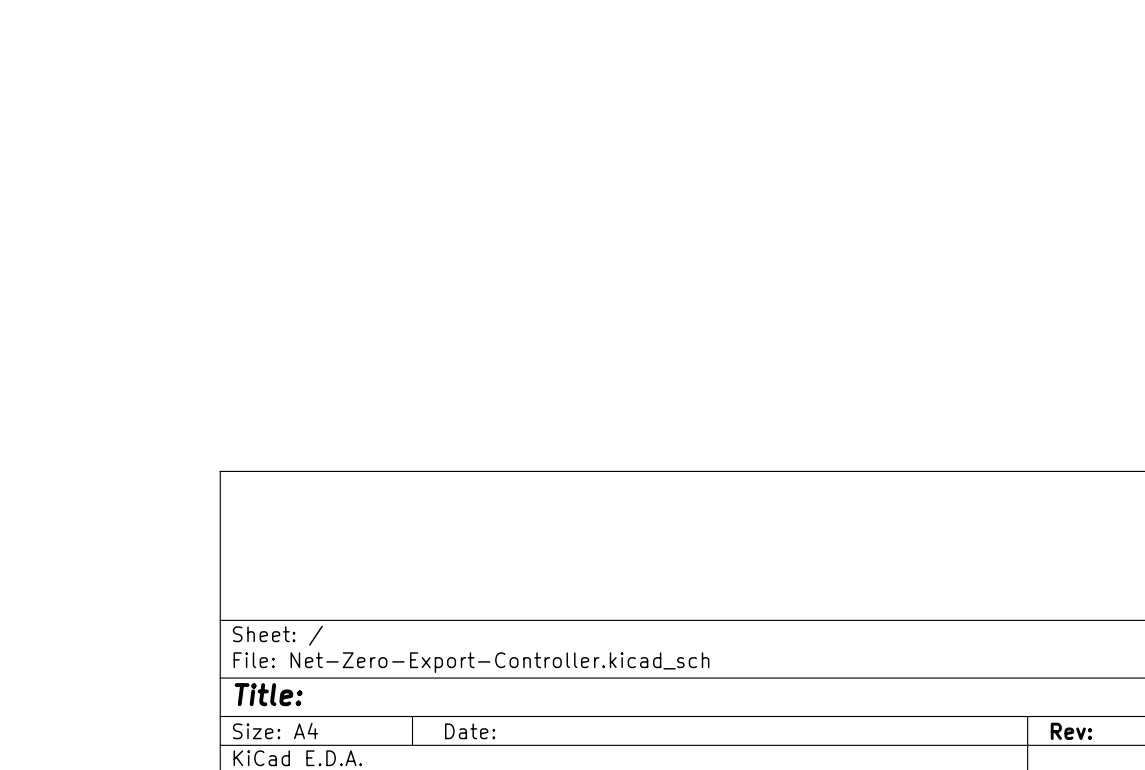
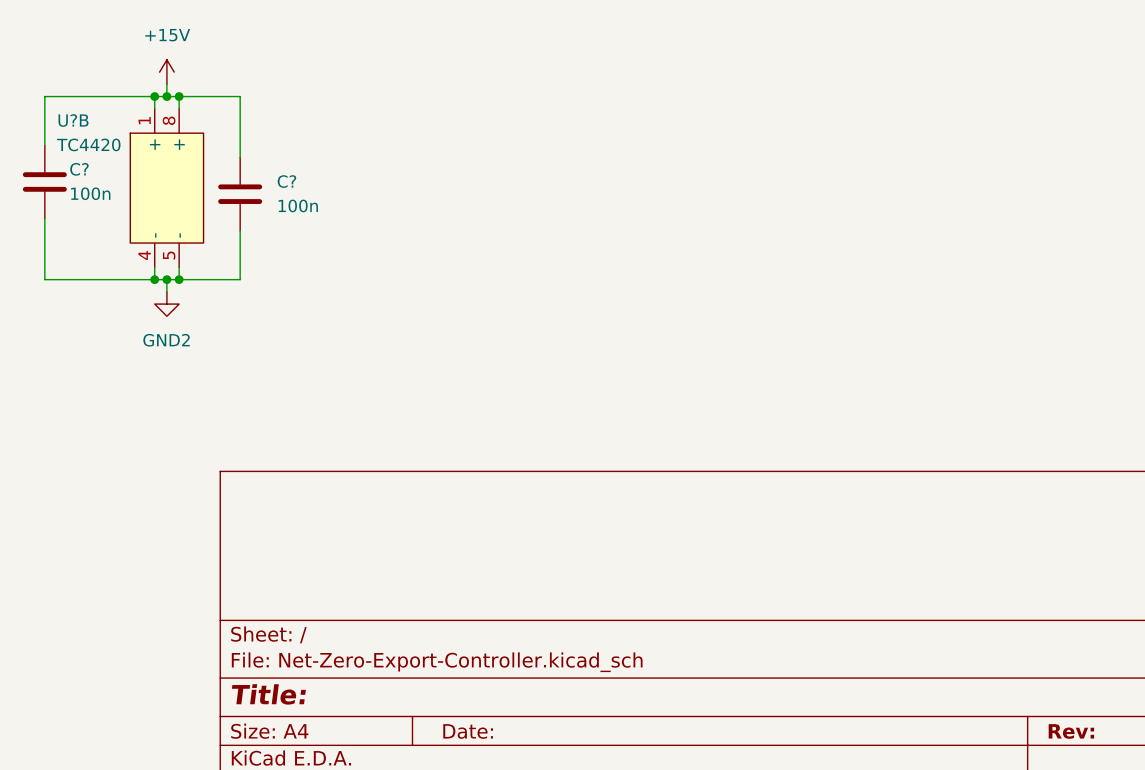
power symbol: none -> +15V (166, 72)
wire: none -> (166, 84) (166, 96)
wire: none -> (154, 96) (154, 108)
junction: none -> (154, 96)
junction: none -> (166, 96)
wire: none -> (179, 96) (179, 108)
junction: none -> (179, 96)
wire: none -> (44, 145) (44, 96) (240, 96) (240, 157)
C?: none -> 100n (44, 182)
U?B: none -> TC4420 (166, 188)
C?: none -> 100n (240, 194)
wire: none -> (44, 218) (44, 279) (240, 279) (240, 230)
wire: none -> (154, 267) (154, 279)
wire: none -> (179, 267) (179, 279)
junction: none -> (154, 279)
wire: none -> (166, 279) (166, 291)
junction: none -> (166, 279)
junction: none -> (179, 279)
power symbol: none -> GND2 (166, 304)

